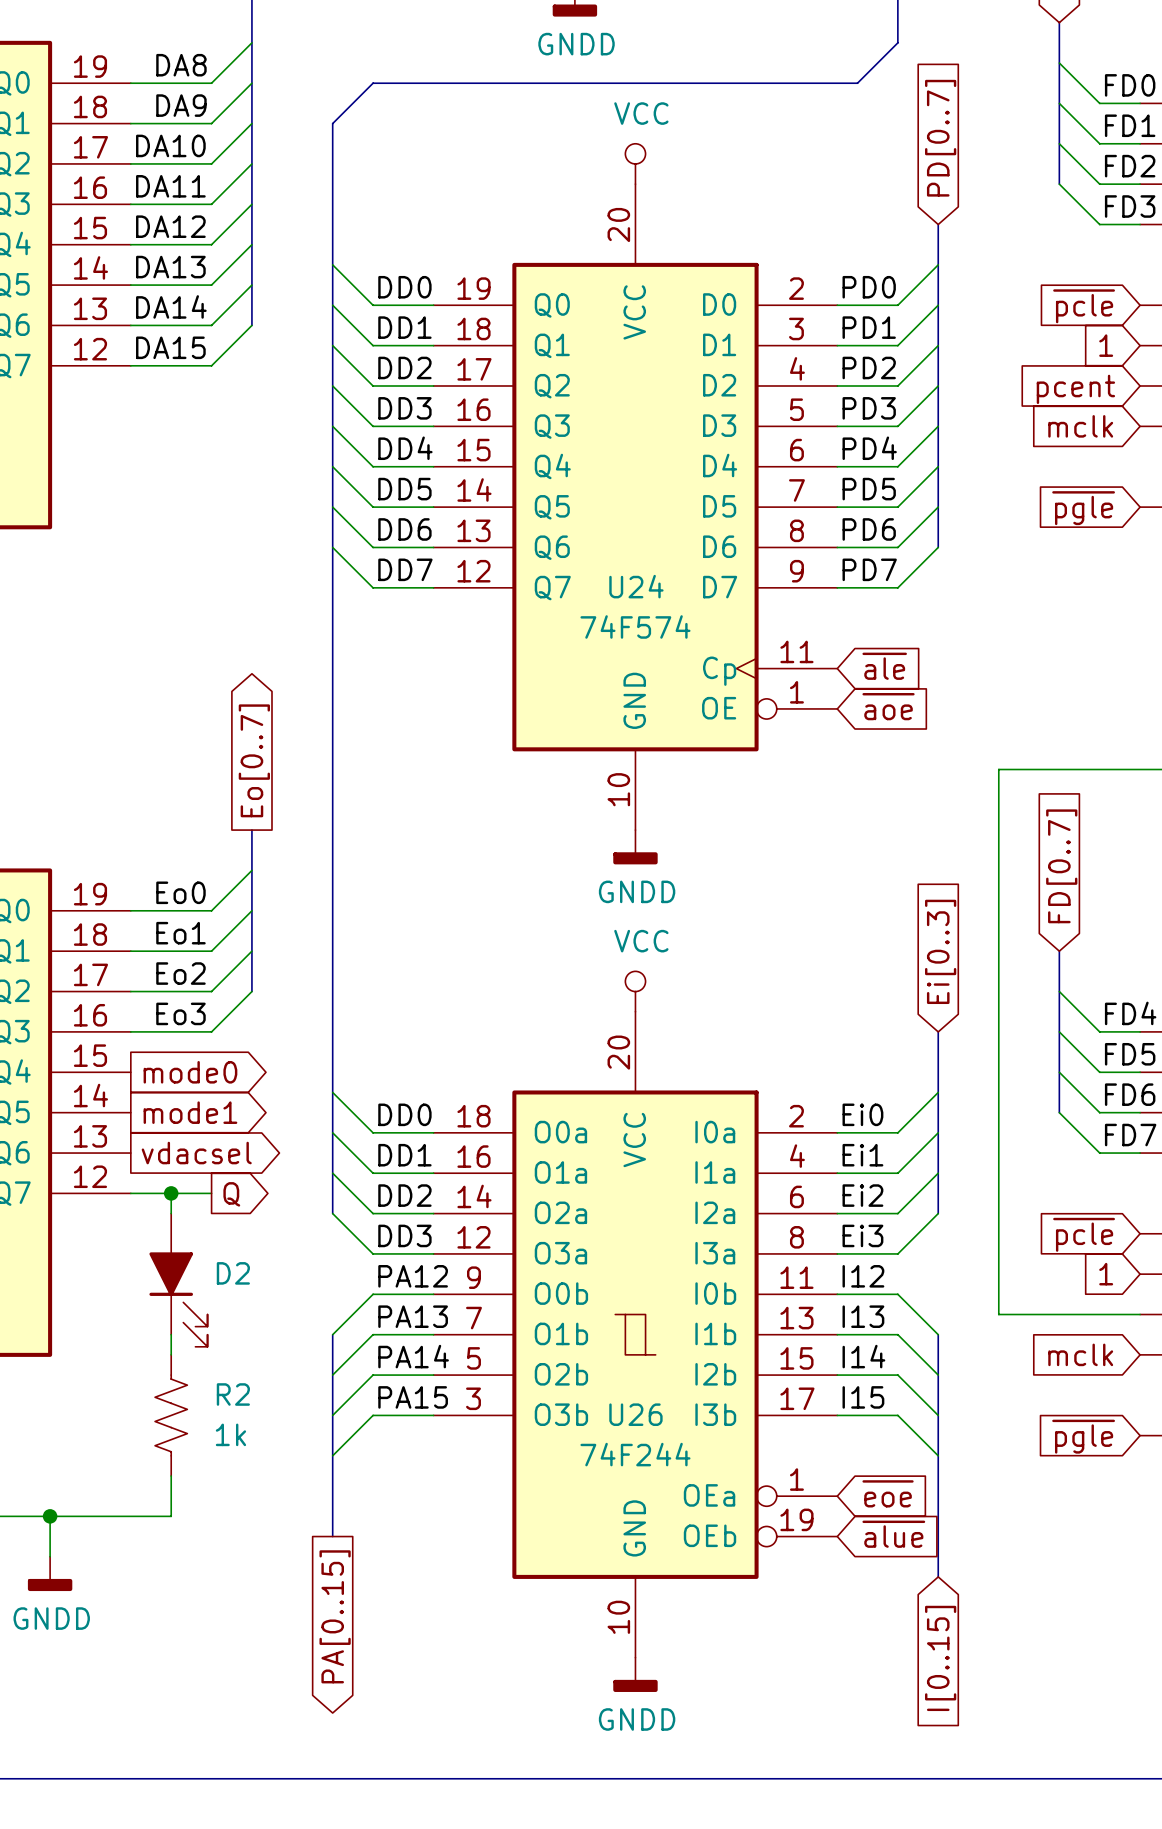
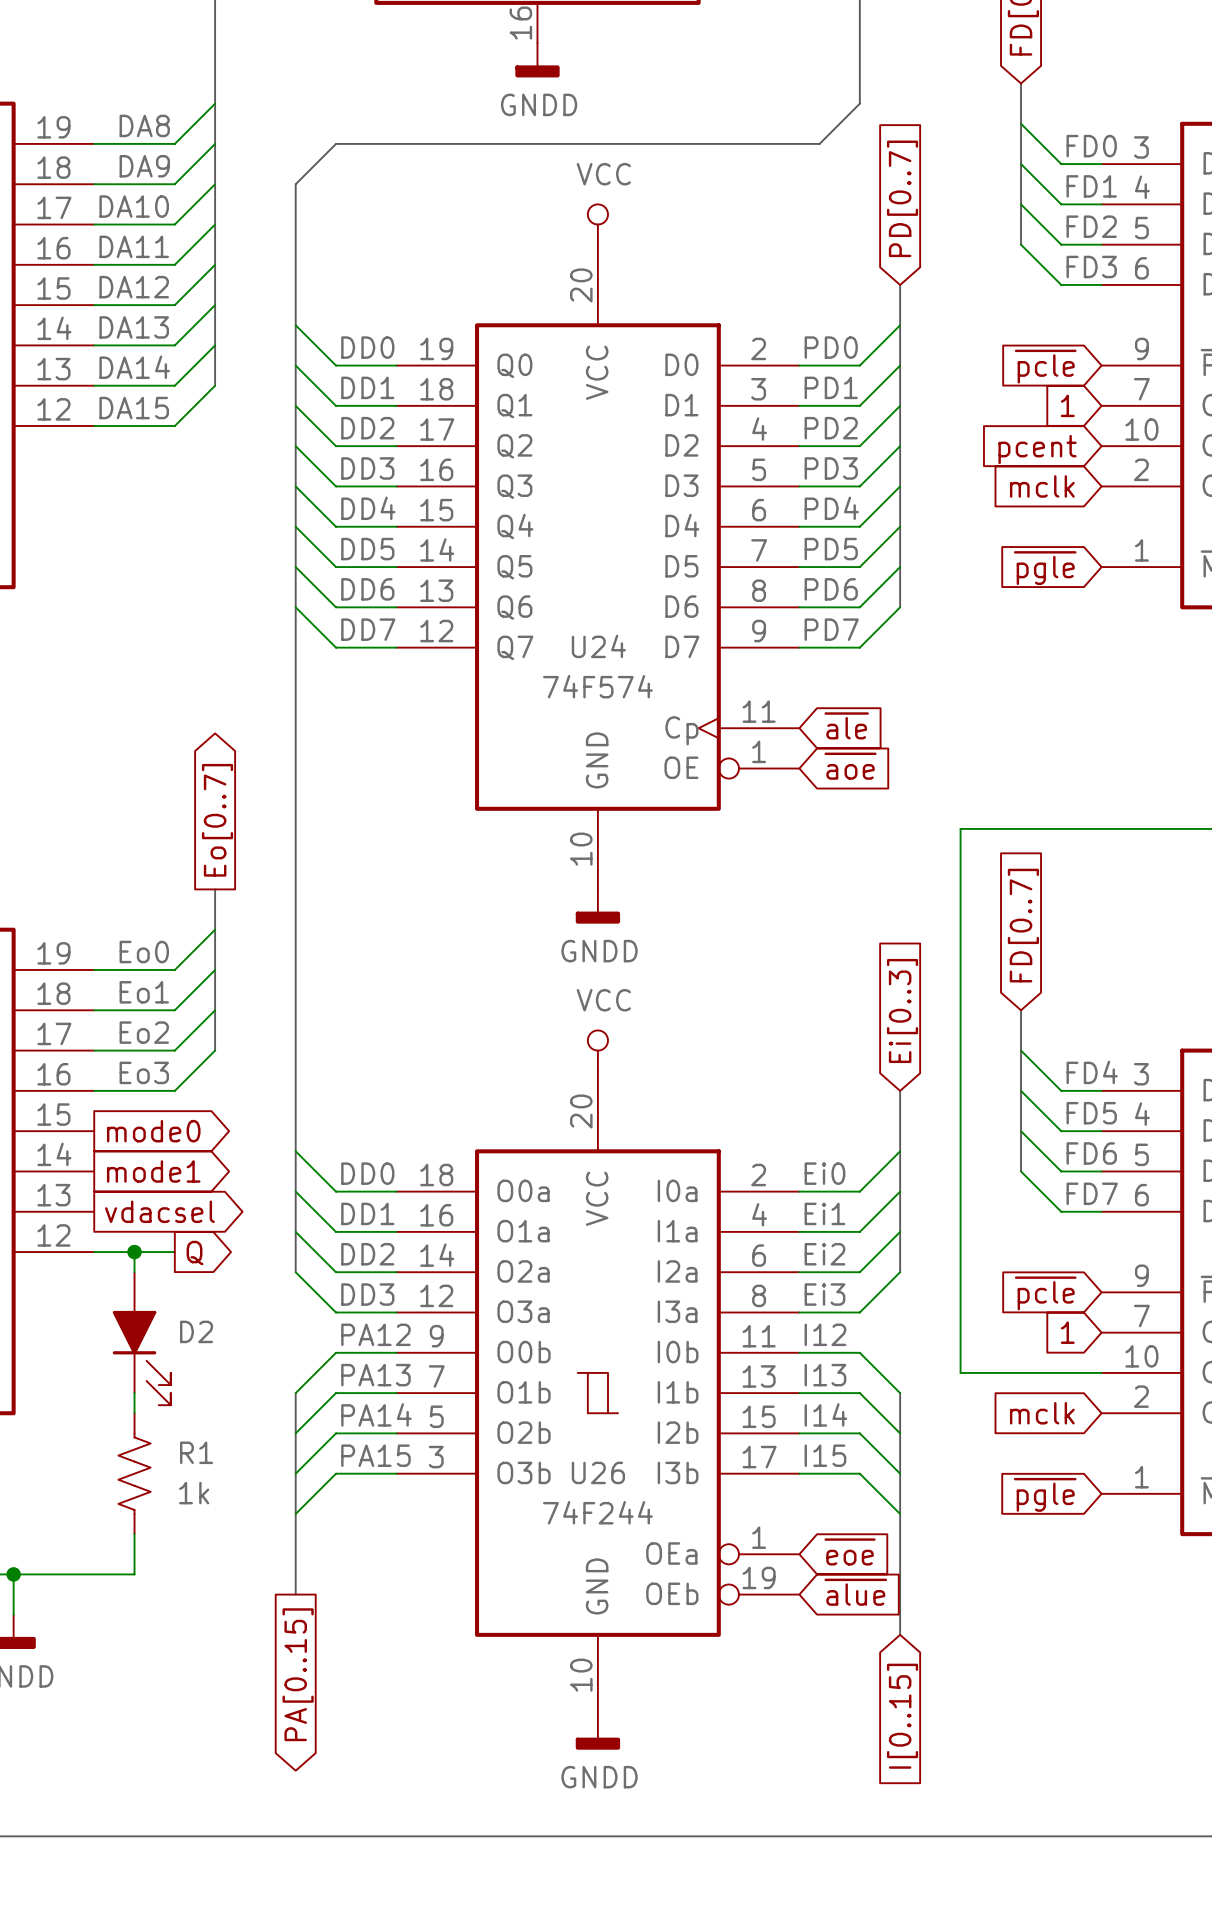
R2 name: R2 (233, 1394) -> R1 (196, 1452)

